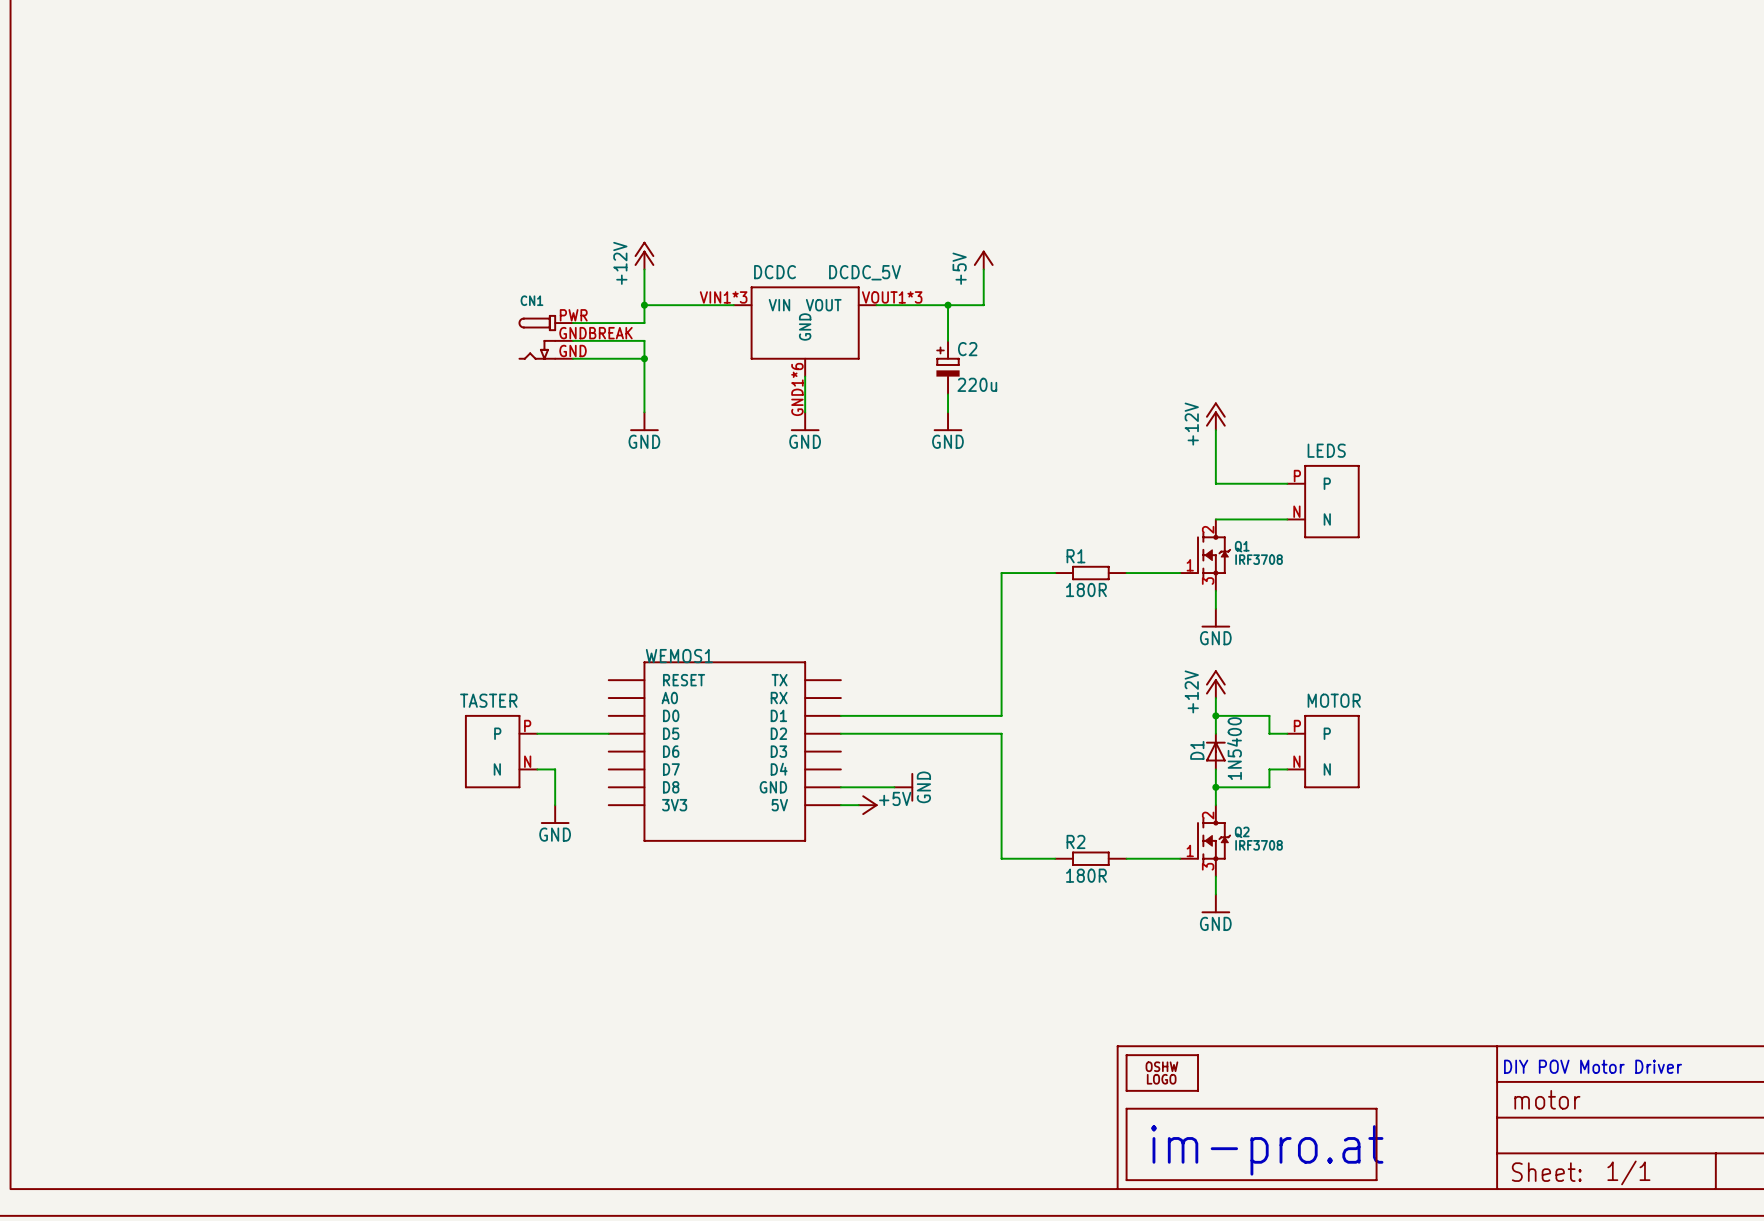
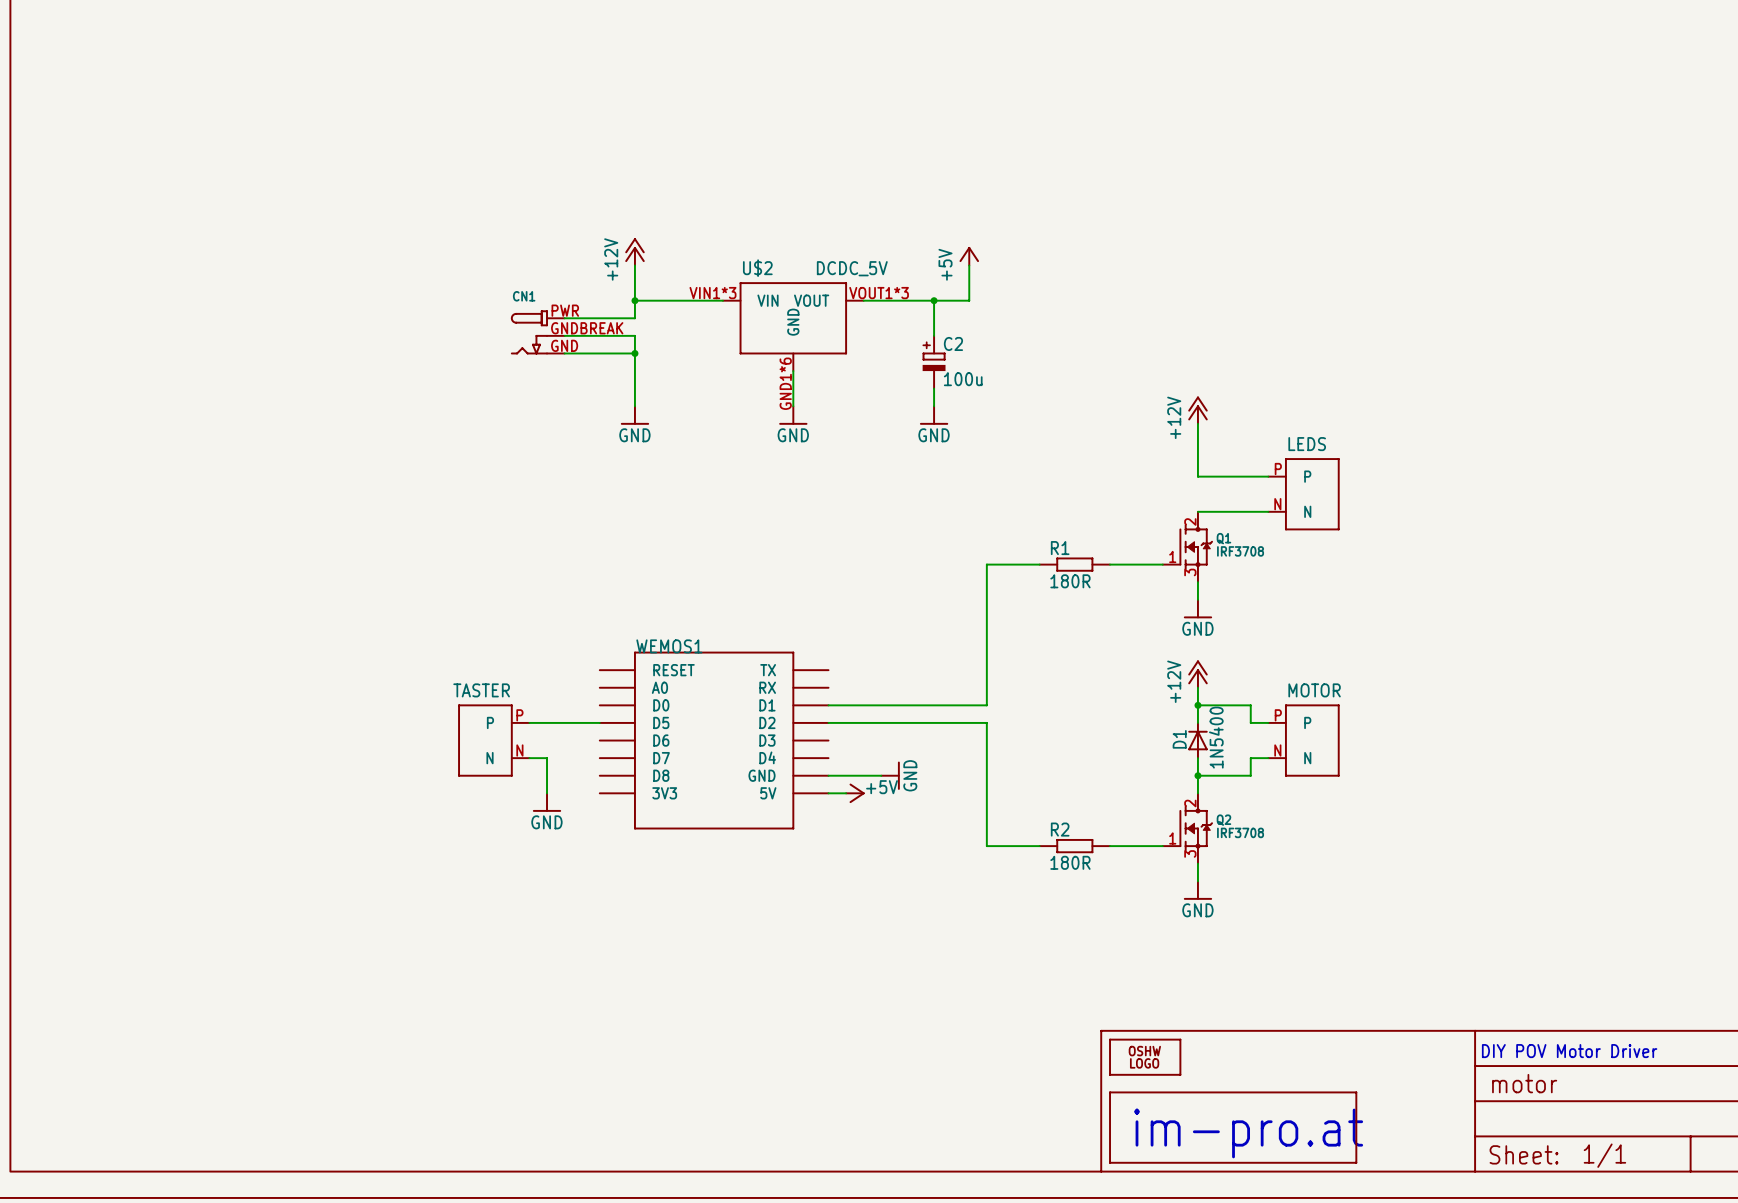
DCDC name: DCDC (775, 272) -> U$2 (757, 268)
C2 value: 220u (977, 384) -> 100u (963, 379)

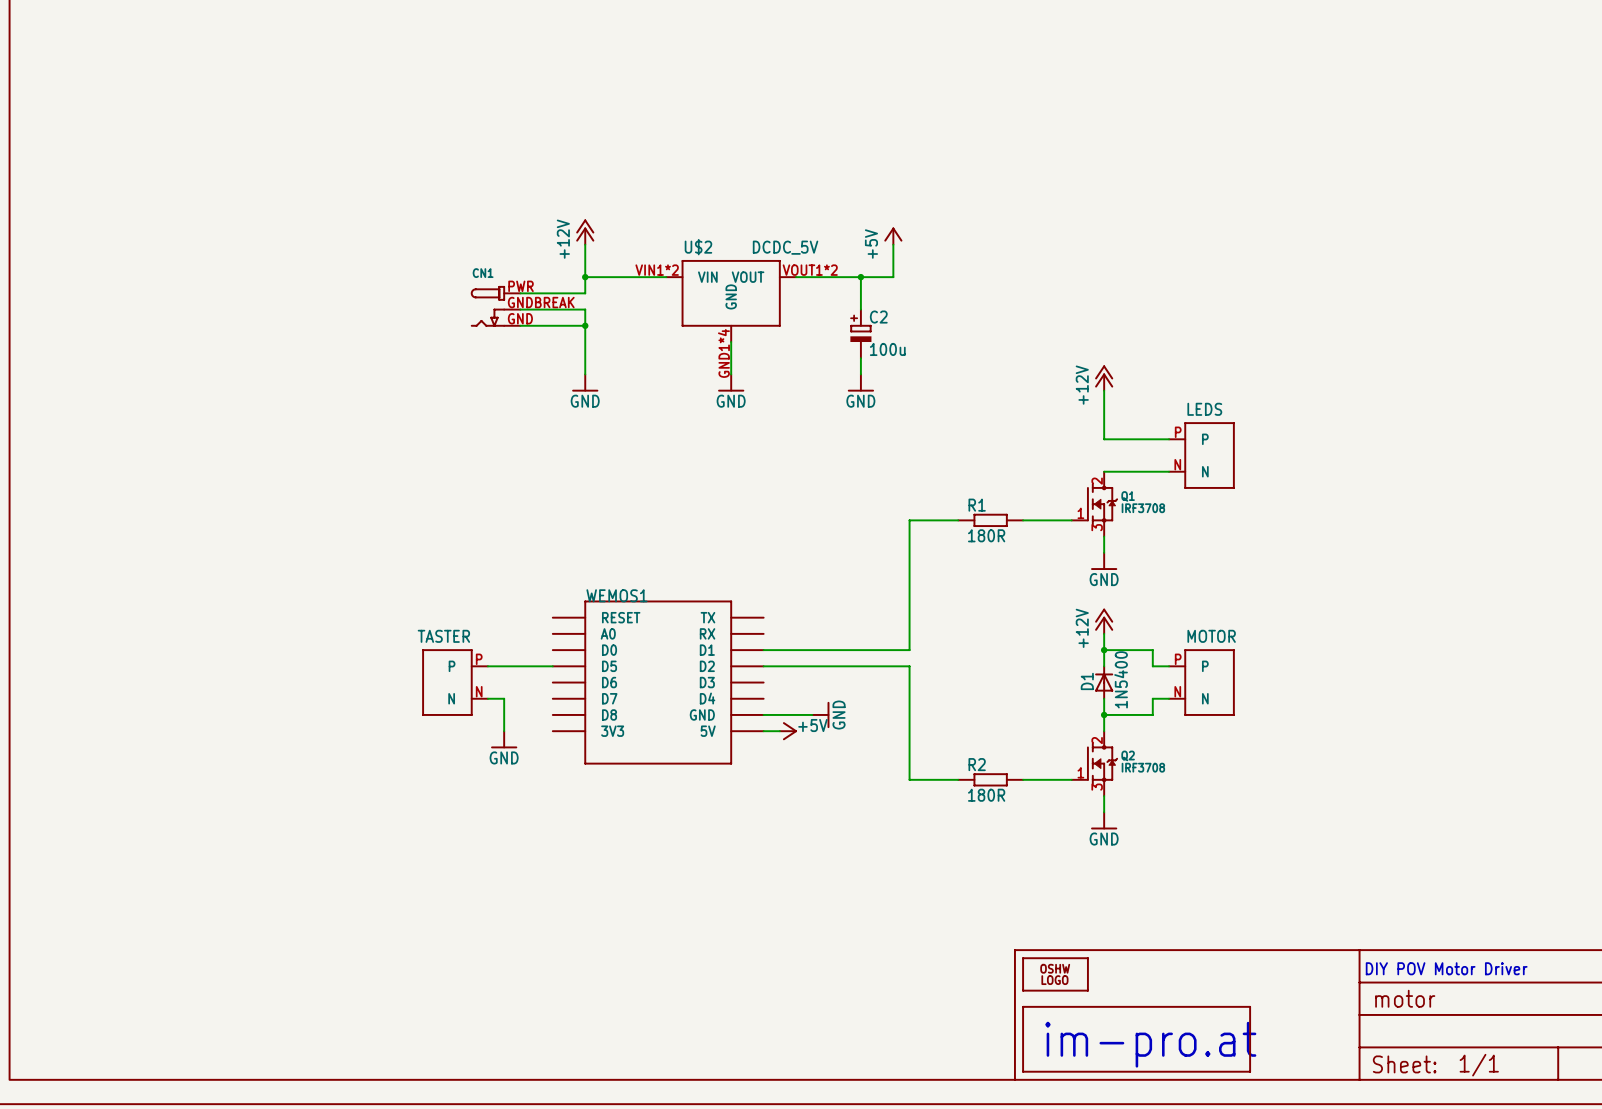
U$2 pin number: VIN1*3 (712, 293) -> VIN1*2 (657, 270)
U$2 pin number: VOUT1*3 (879, 293) -> VOUT1*2 (810, 270)
U$2 pin number: GND1*6 (785, 383) -> GND1*4 (723, 353)

